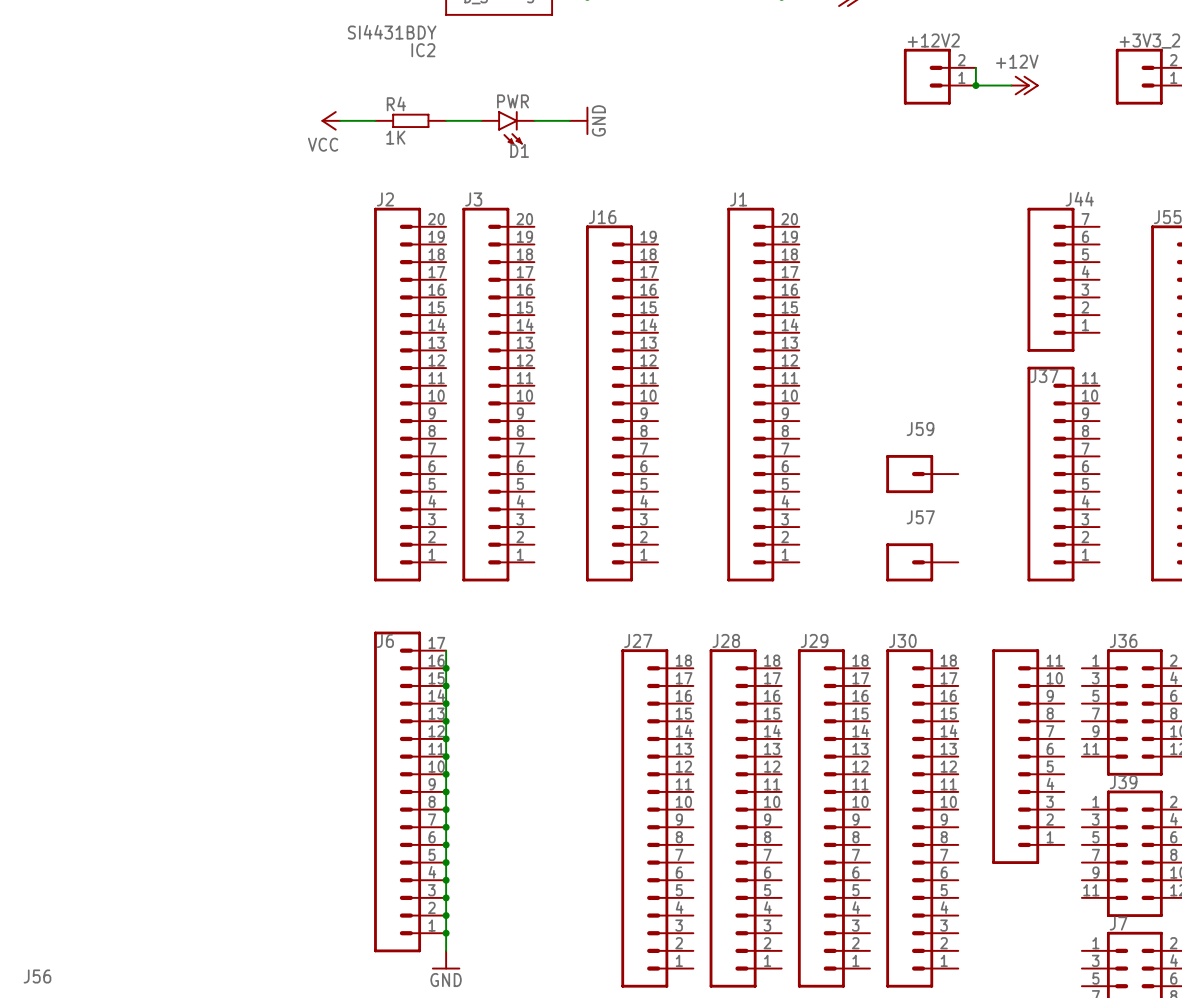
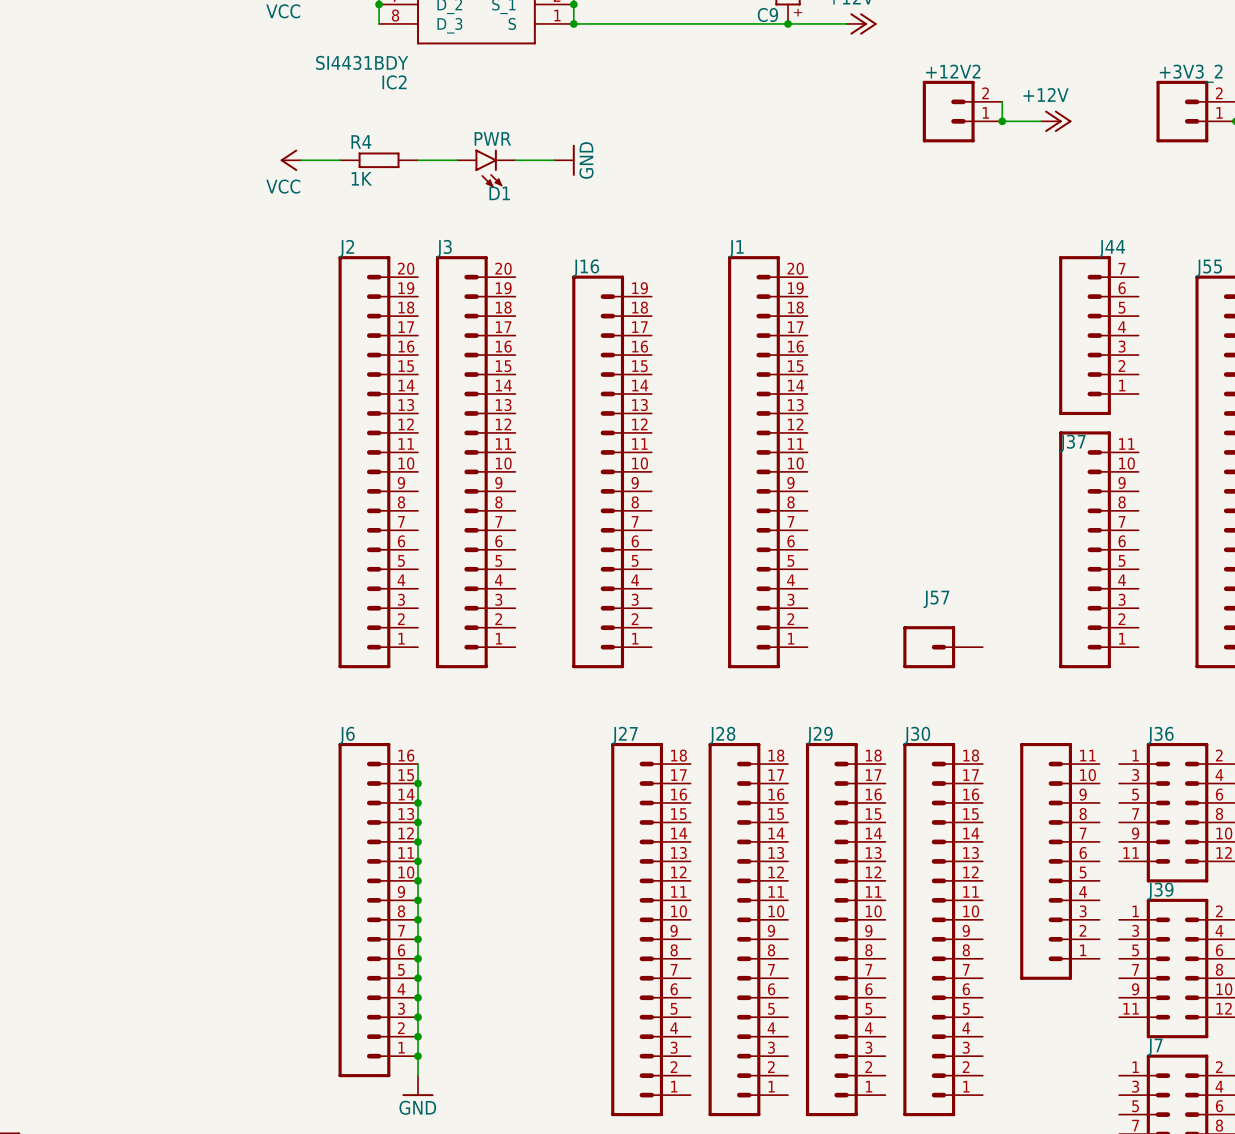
J59: (922, 474) -> none
J6 symbol: [374, 631, 447, 953] -> [338, 742, 418, 1078]
wire: (446, 650) (446, 668) -> none
junction: (446, 668) -> none

